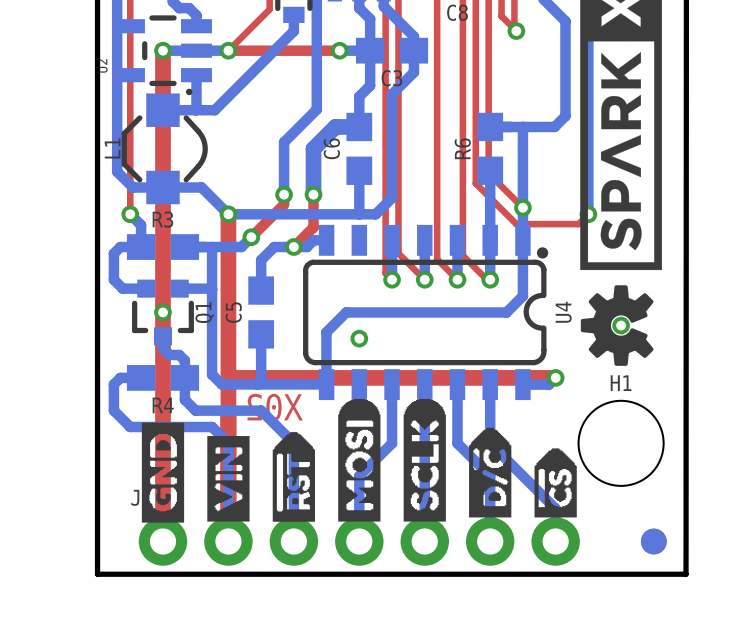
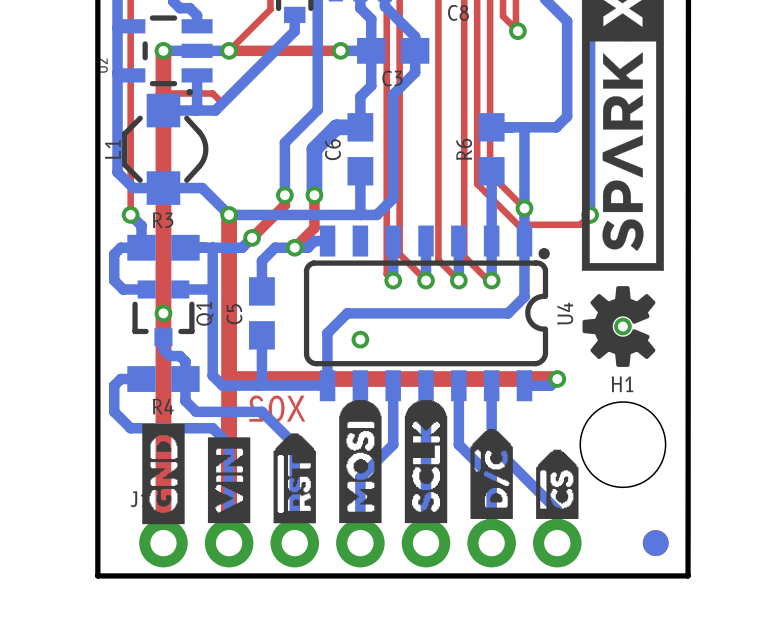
top track: none -> (163, 93) (212, 93) (221, 102)

